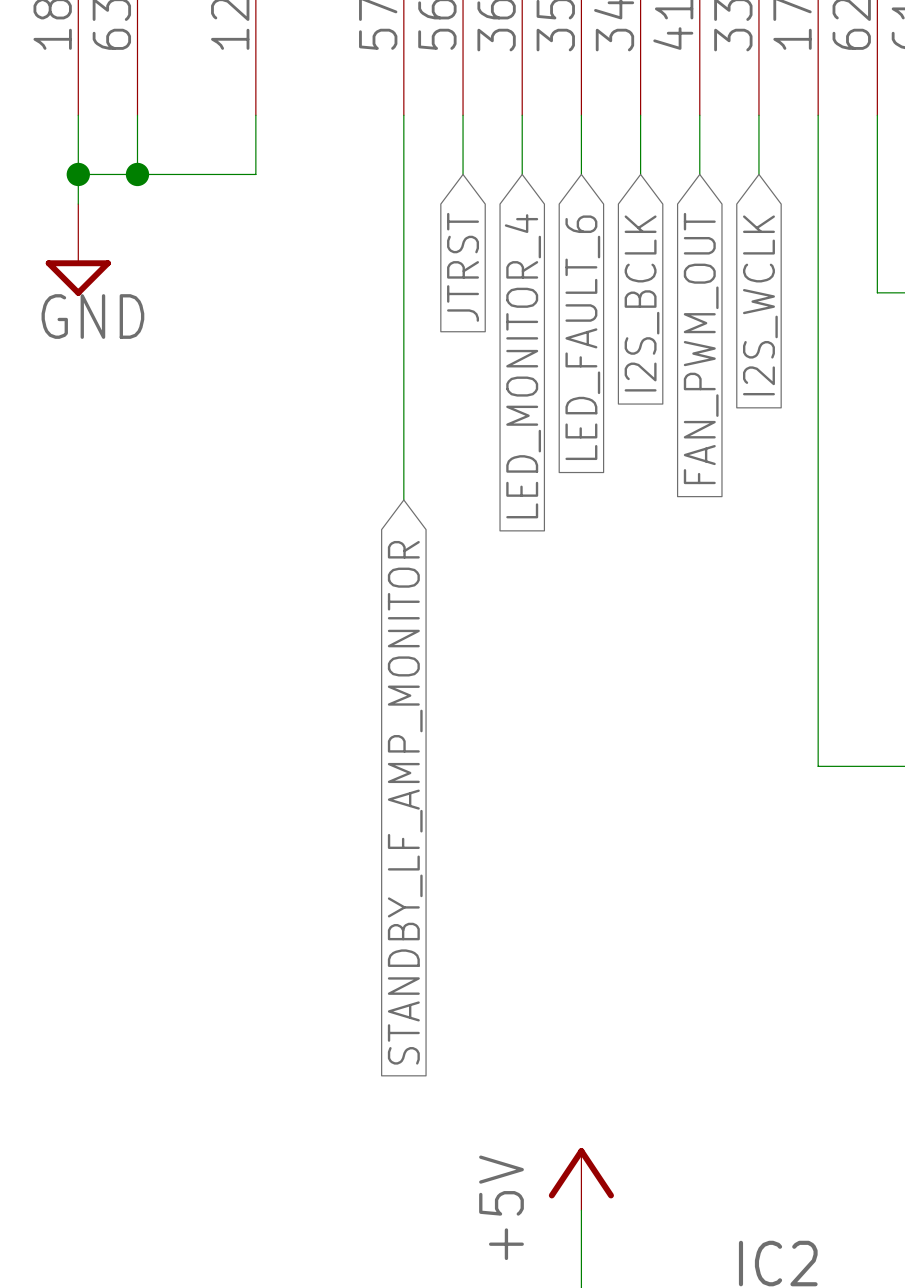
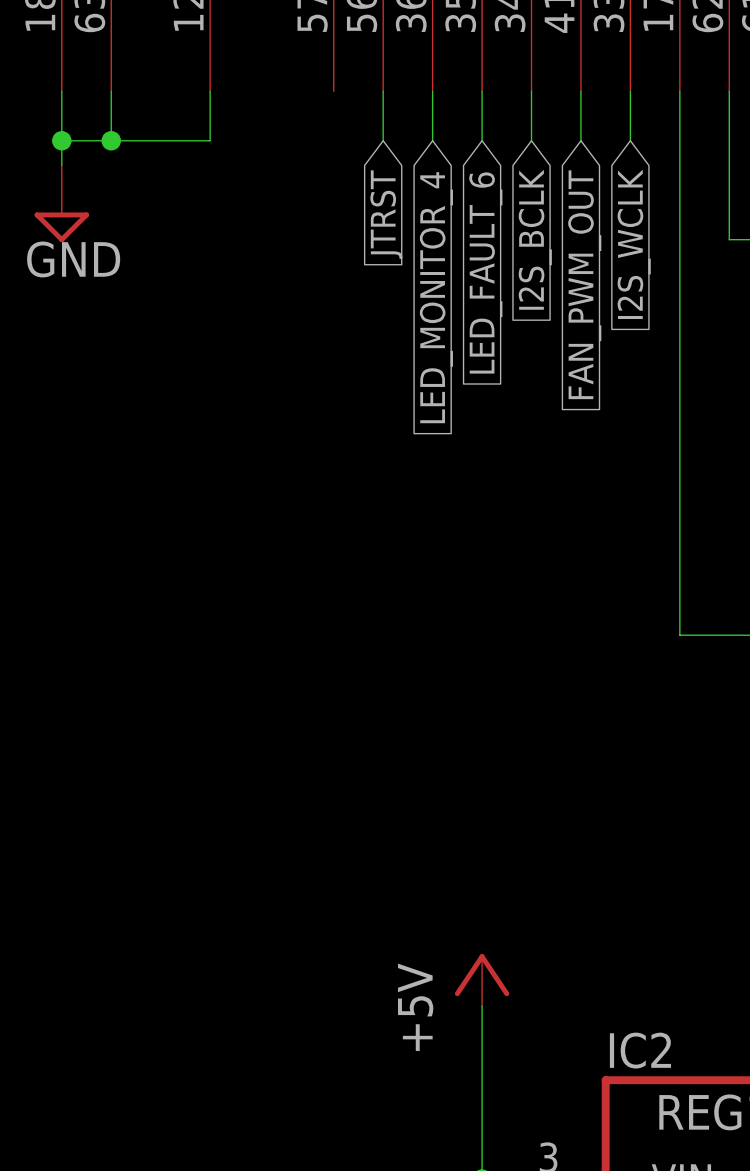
wire: (403, 115) (403, 500) -> none
global label: STANDBY_LF_AMP_MONITOR (405, 802) -> none

